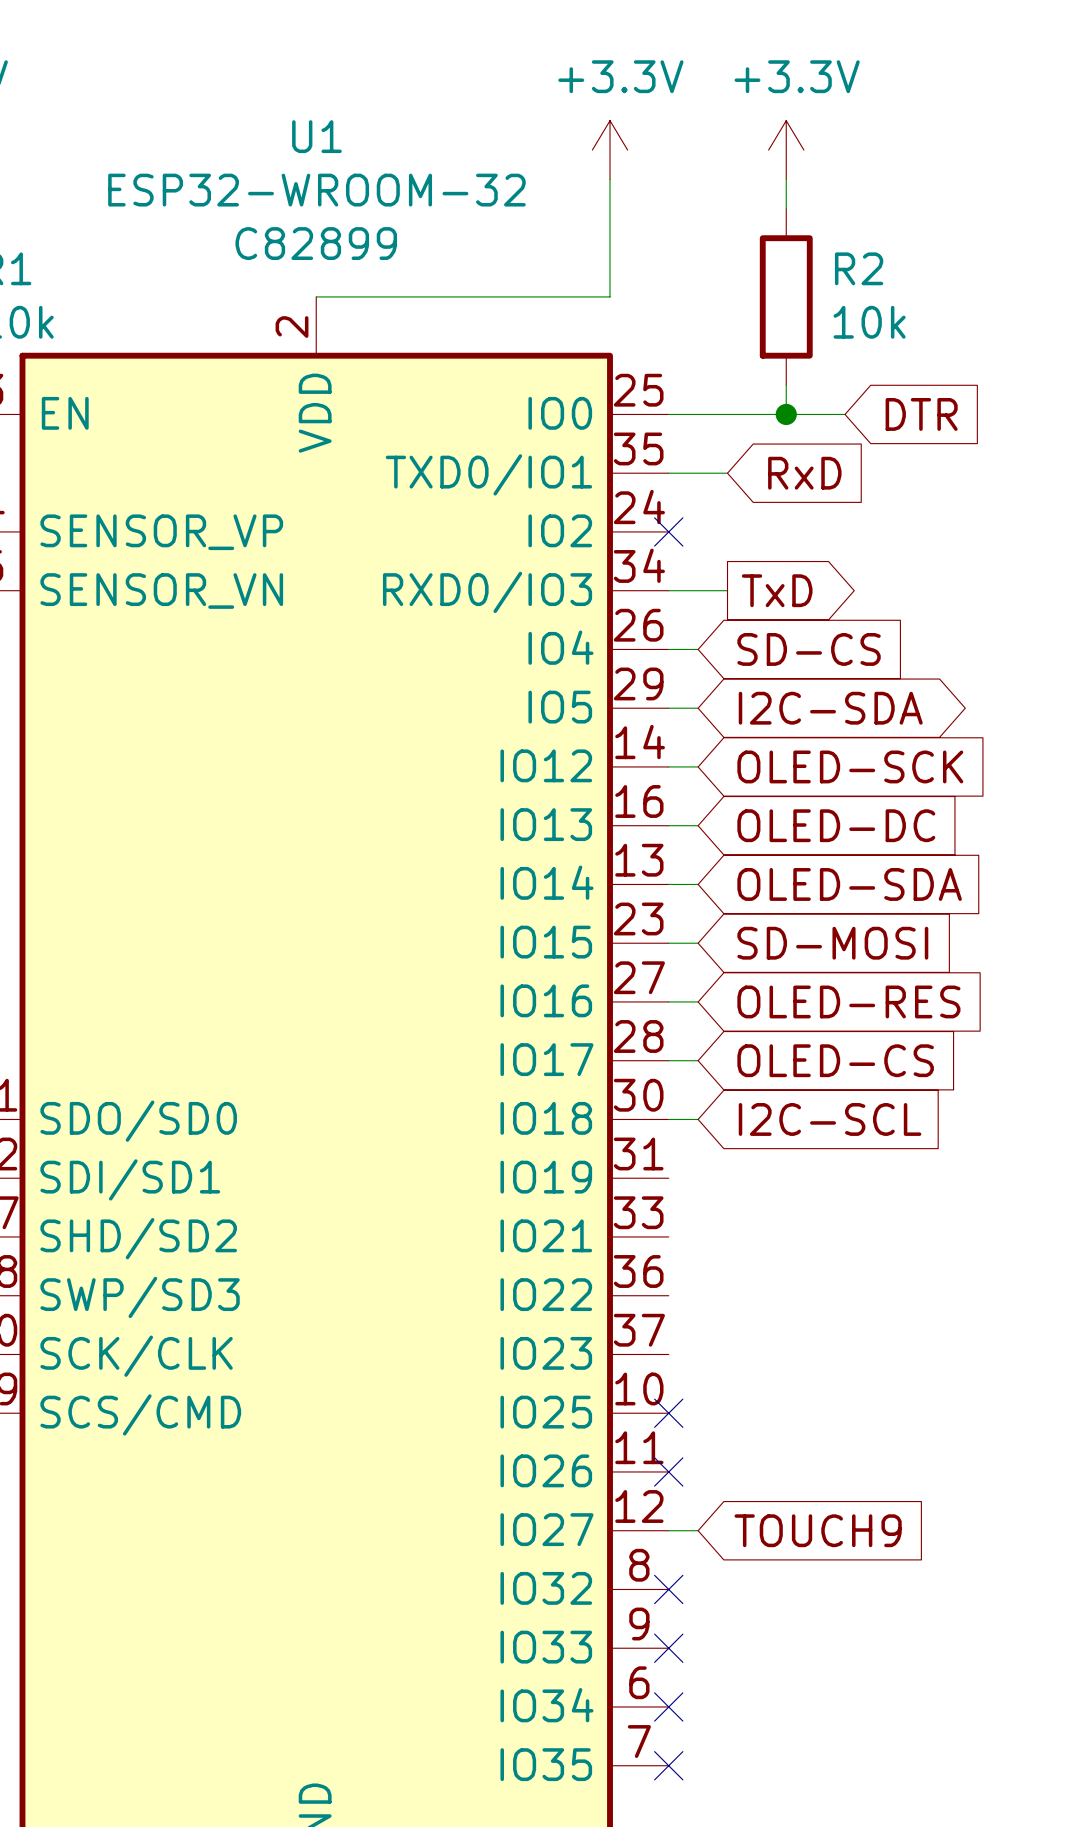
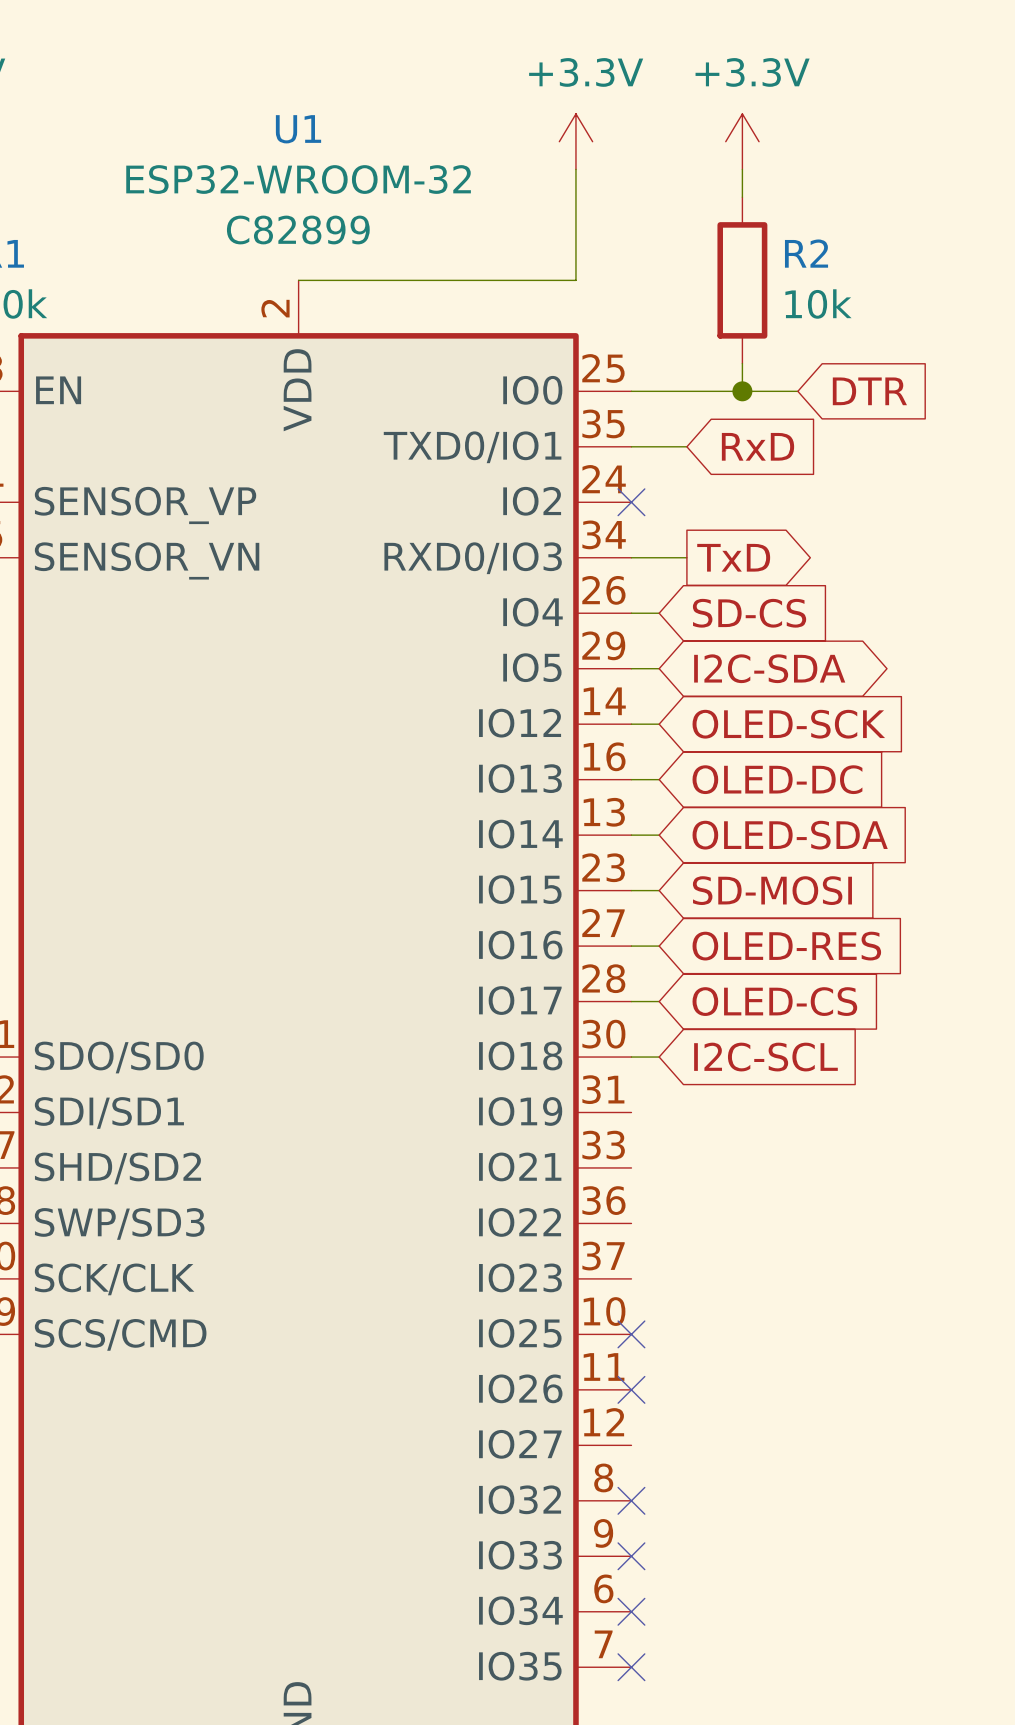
wire: (668, 1530) (698, 1530) -> none
global label: TOUCH9 (818, 1530) -> none

